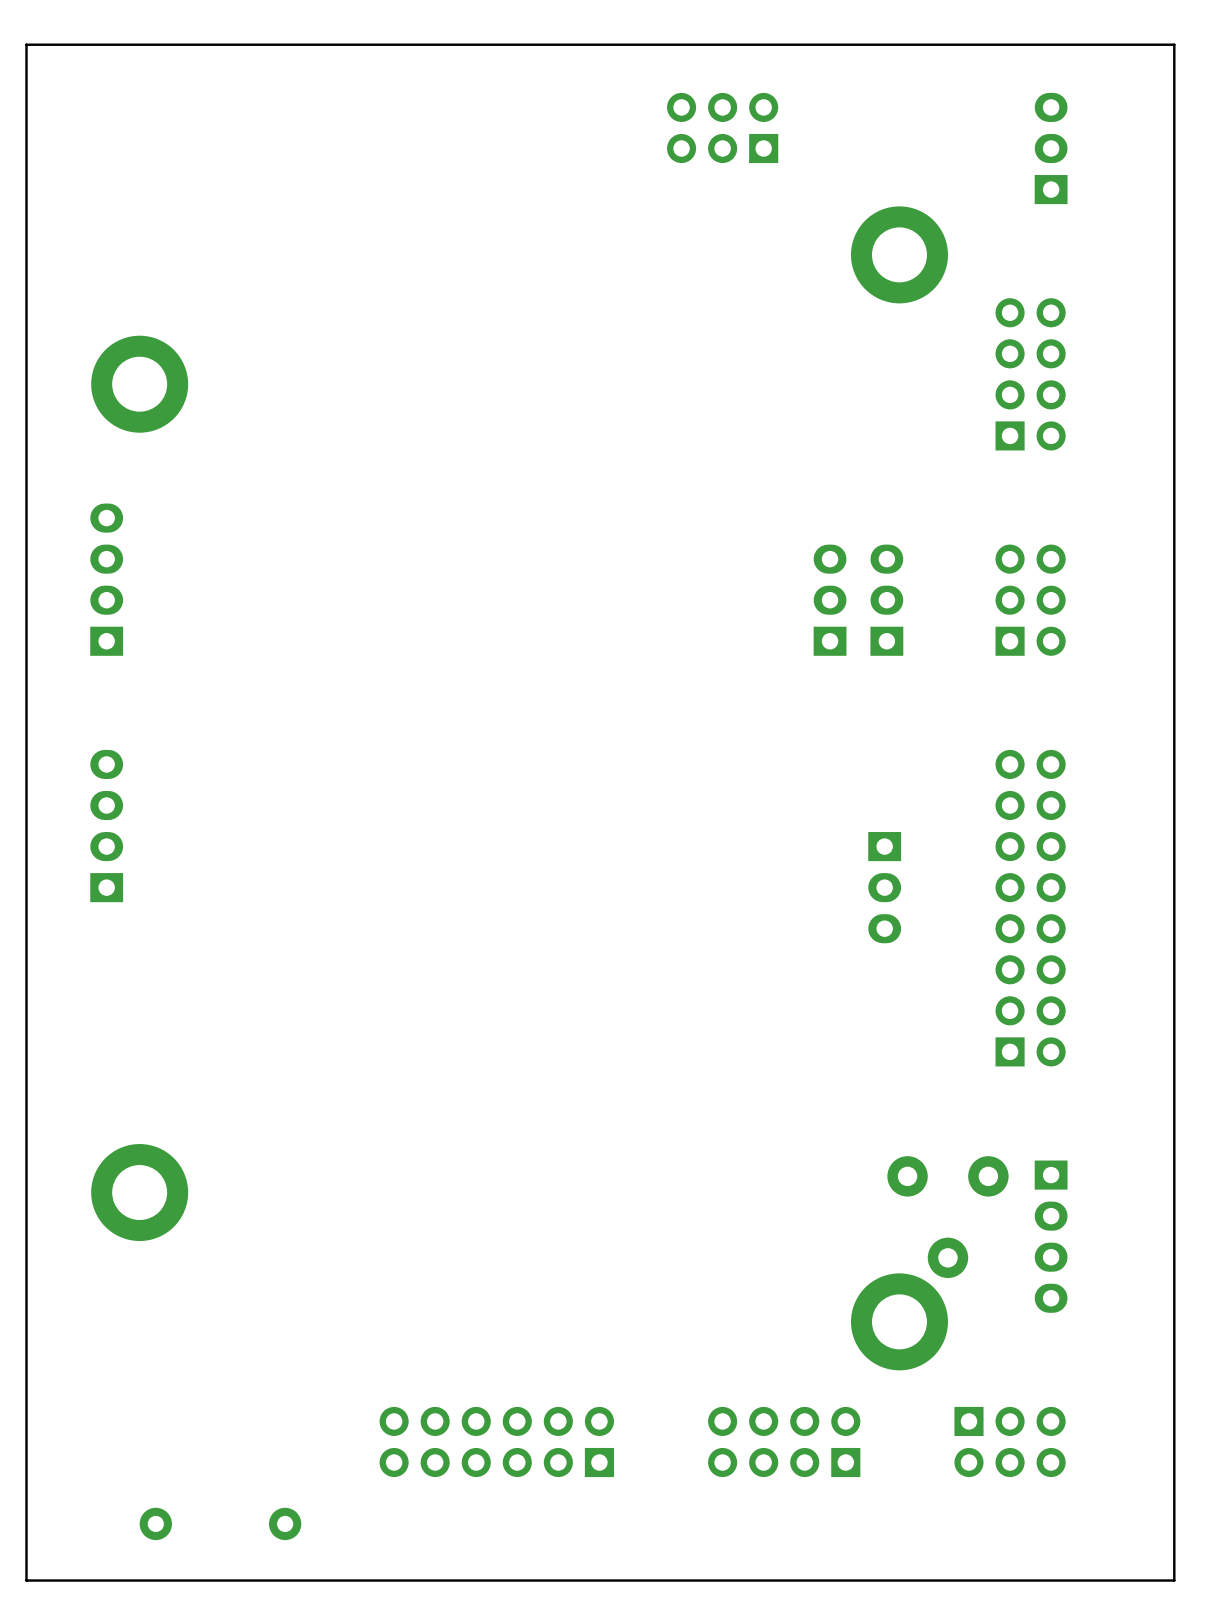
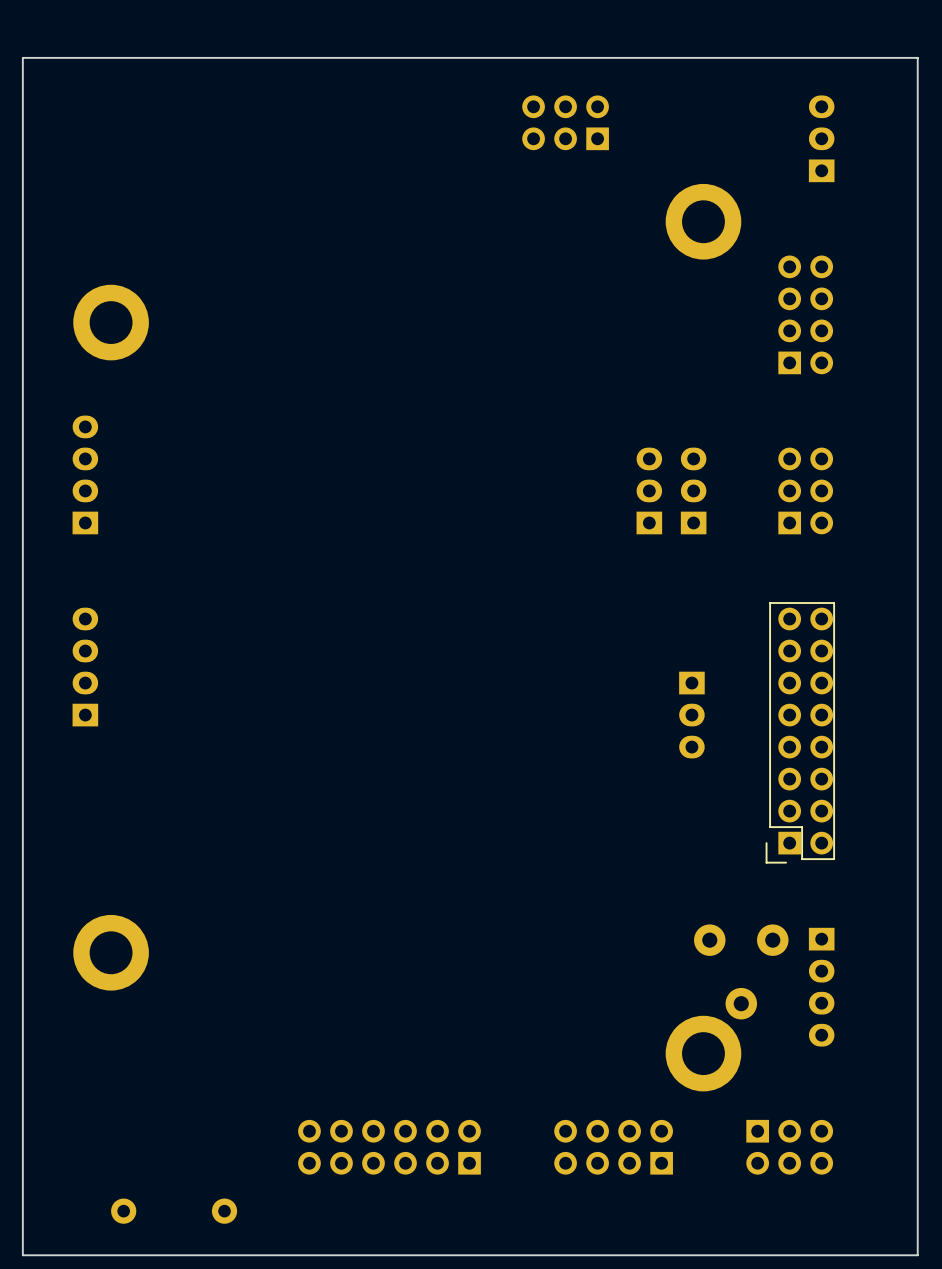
part footprint: [995, 749, 1066, 1067] -> [765, 602, 836, 864]

